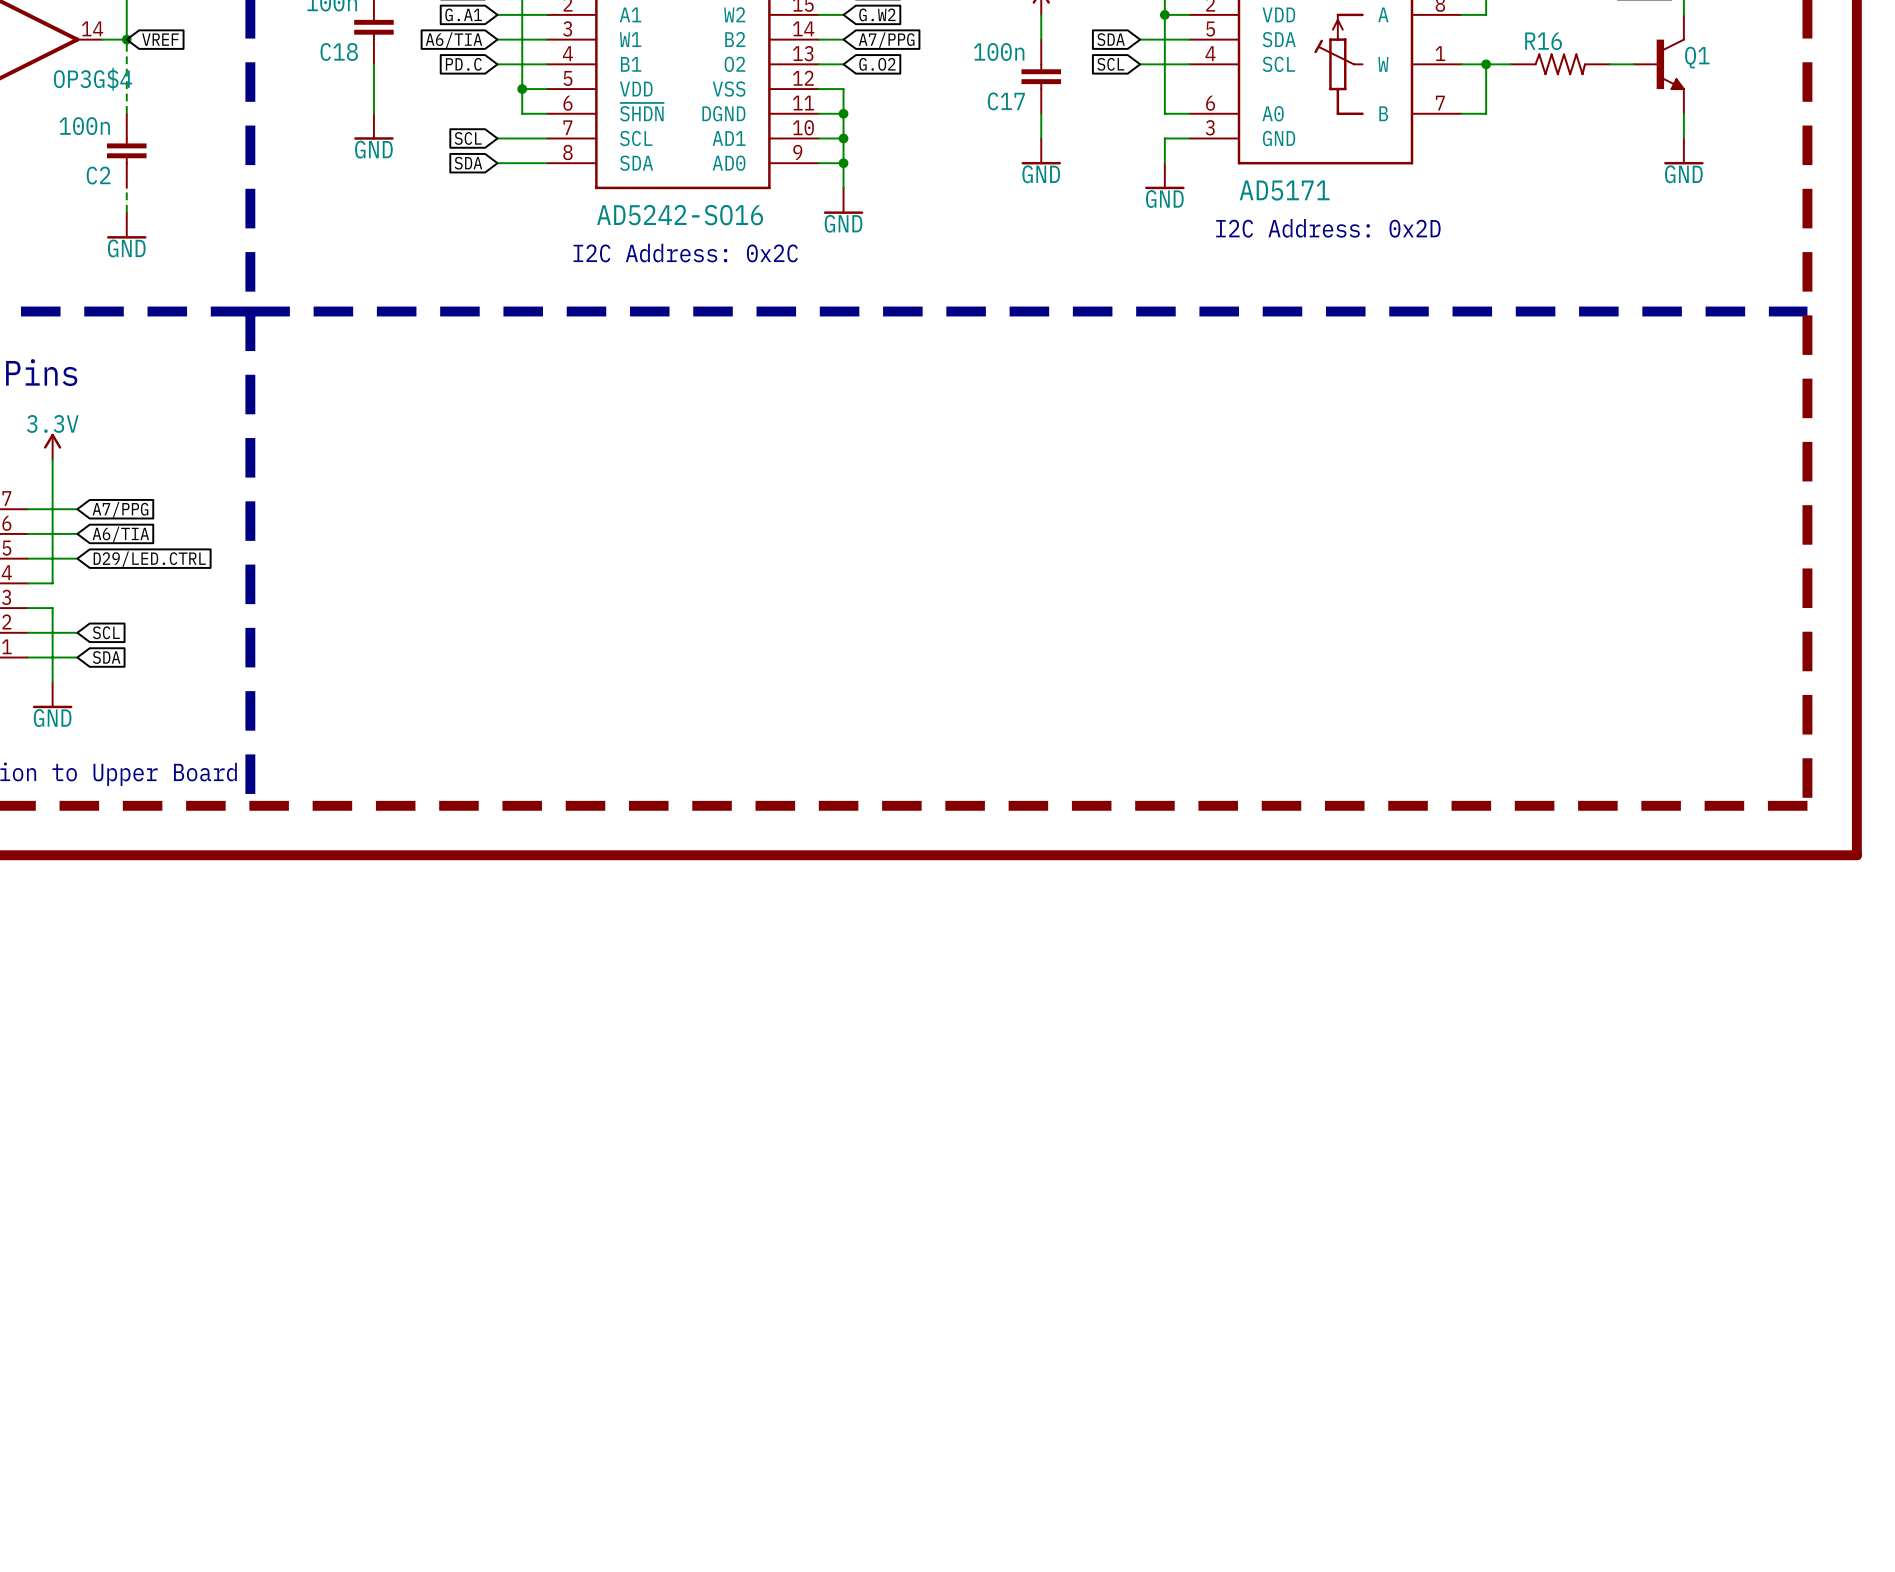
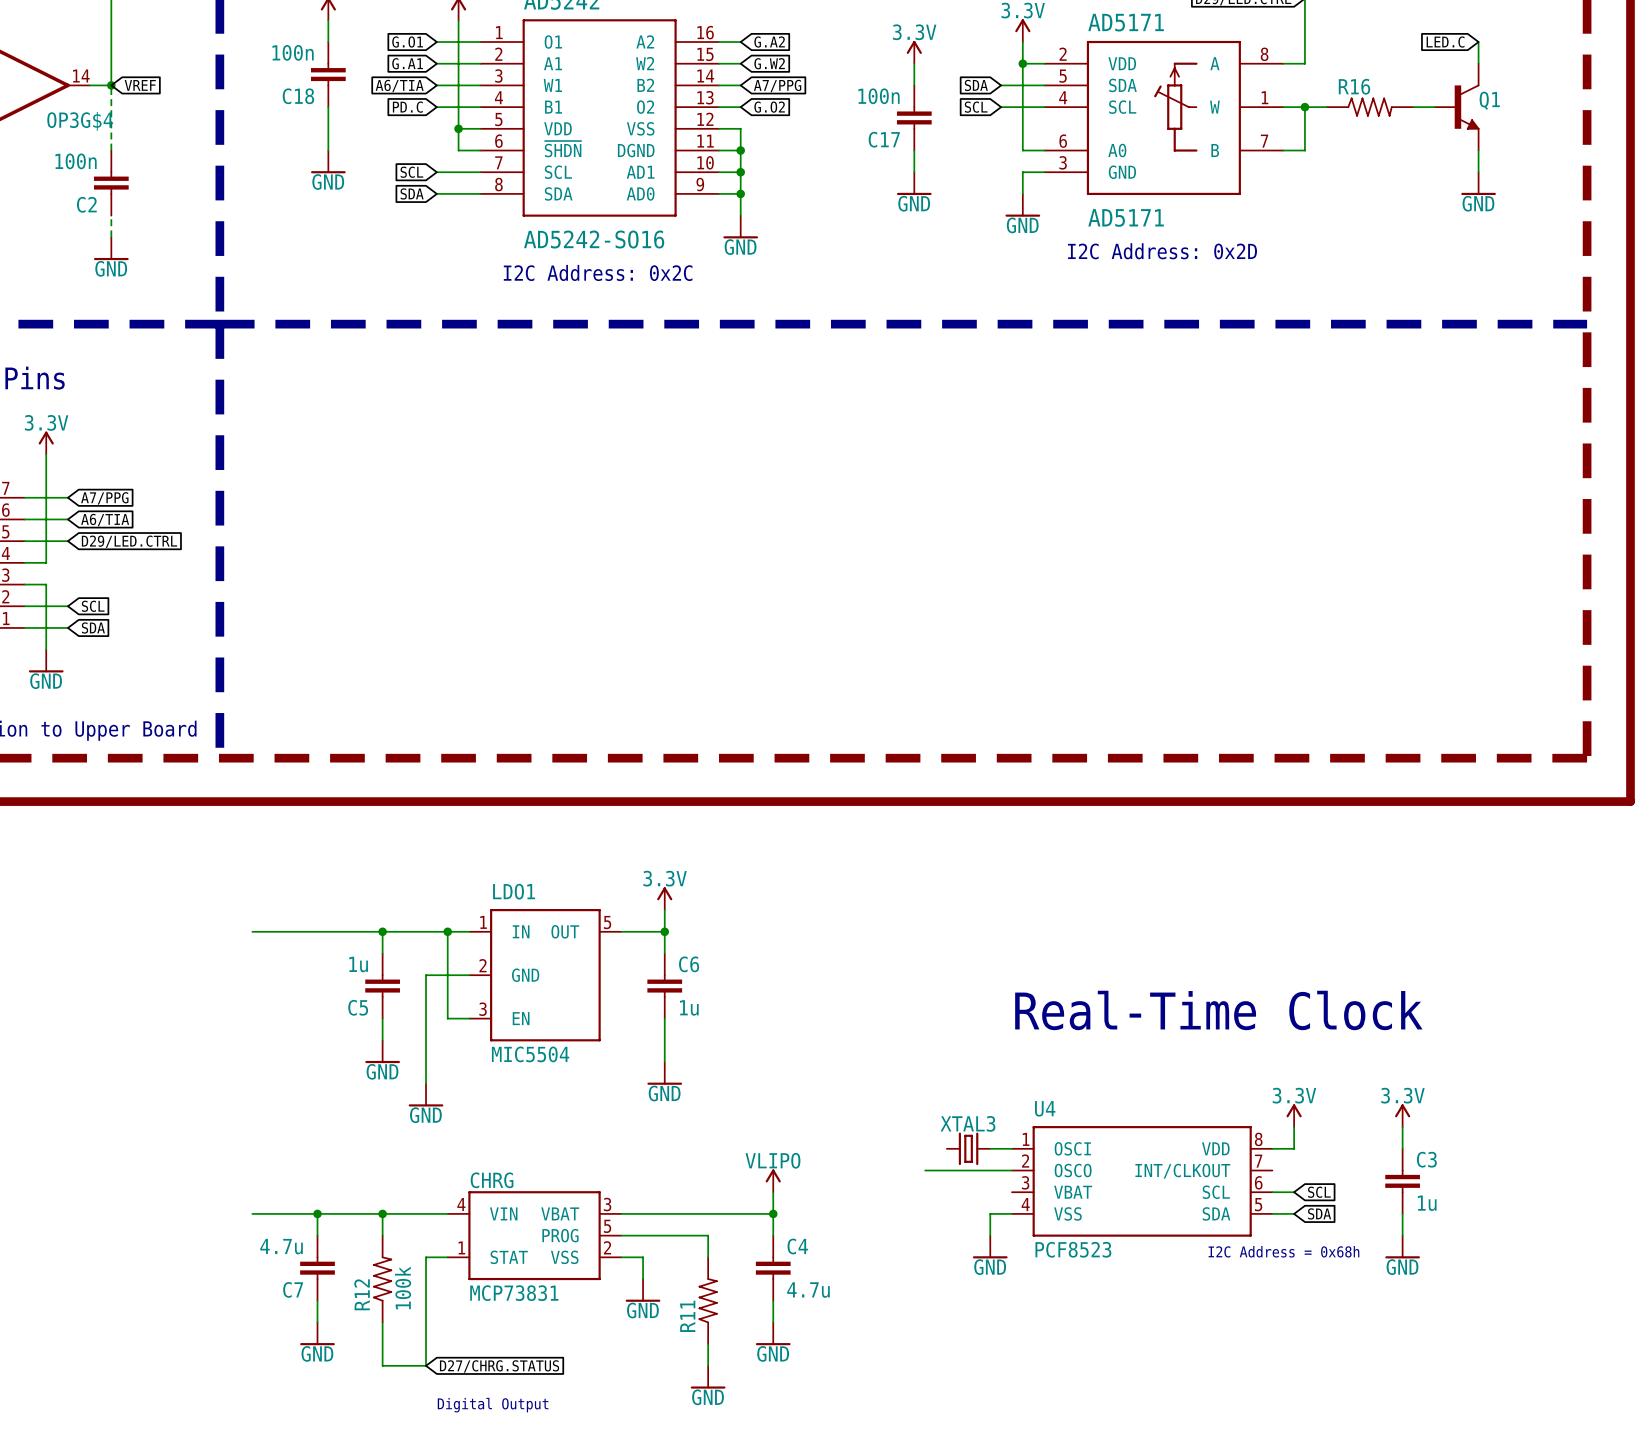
power symbol: none -> 3.3V (664, 898)
wire: none -> (664, 910) (664, 953)
wire: none -> (252, 931) (469, 931)
wire: none -> (382, 931) (382, 953)
junction: none -> (382, 931)
wire: none -> (447, 931) (447, 1018) (469, 1018)
junction: none -> (447, 931)
wire: none -> (621, 931) (664, 931)
junction: none -> (664, 931)
wire: none -> (469, 975) (426, 975) (426, 1083)
LDO1: none -> MIC5504 (545, 975)
C5: none -> 1u (382, 986)
C6: none -> 1u (664, 986)
text: none -> Real-Time Clock (1218, 1010)
wire: none -> (382, 1018) (382, 1040)
wire: none -> (664, 1018) (664, 1062)
power symbol: none -> GND (382, 1051)
power symbol: none -> GND (664, 1073)
power symbol: none -> GND (426, 1095)
power symbol: none -> 3.3V (1294, 1115)
power symbol: none -> 3.3V (1402, 1115)
wire: none -> (1294, 1127) (1294, 1148) (1272, 1148)
wire: none -> (1402, 1127) (1402, 1148)
XTAL3: none -> (968, 1148)
wire: none -> (990, 1148) (1011, 1148)
wire: none -> (925, 1170) (1011, 1170)
power symbol: none -> VLIPO (773, 1180)
U4: none -> PCF8523 (1142, 1181)
C3: none -> 1u (1402, 1181)
wire: none -> (773, 1192) (773, 1235)
wire: none -> (1272, 1192) (1294, 1192)
global label: none -> SCL (1319, 1192)
wire: none -> (252, 1213) (447, 1213)
wire: none -> (317, 1213) (317, 1235)
junction: none -> (317, 1213)
wire: none -> (382, 1213) (382, 1235)
junction: none -> (382, 1213)
wire: none -> (621, 1213) (773, 1213)
junction: none -> (773, 1213)
wire: none -> (1011, 1213) (990, 1213) (990, 1235)
wire: none -> (1272, 1213) (1294, 1213)
global label: none -> SDA (1319, 1213)
wire: none -> (1402, 1213) (1402, 1235)
CHRG: none -> MCP73831 (534, 1235)
wire: none -> (621, 1235) (708, 1235) (708, 1257)
power symbol: none -> GND (990, 1247)
power symbol: none -> GND (1402, 1247)
text: none -> I2C Address = 0x68h (1283, 1251)
wire: none -> (447, 1257) (426, 1257) (426, 1365) (382, 1365) (382, 1322)
wire: none -> (621, 1257) (643, 1257) (643, 1279)
C7: none -> 4.7u (317, 1268)
C4: none -> 4.7u (773, 1268)
R12: none -> 100k (382, 1279)
power symbol: none -> GND (643, 1290)
wire: none -> (317, 1300) (317, 1322)
R11: none -> (708, 1300)
wire: none -> (773, 1300) (773, 1322)
power symbol: none -> GND (317, 1333)
power symbol: none -> GND (773, 1333)
wire: none -> (708, 1344) (708, 1365)
global label: none -> D27/CHRG.STATUS (499, 1366)
power symbol: none -> GND (708, 1377)
text: none -> Digital Output (493, 1405)

